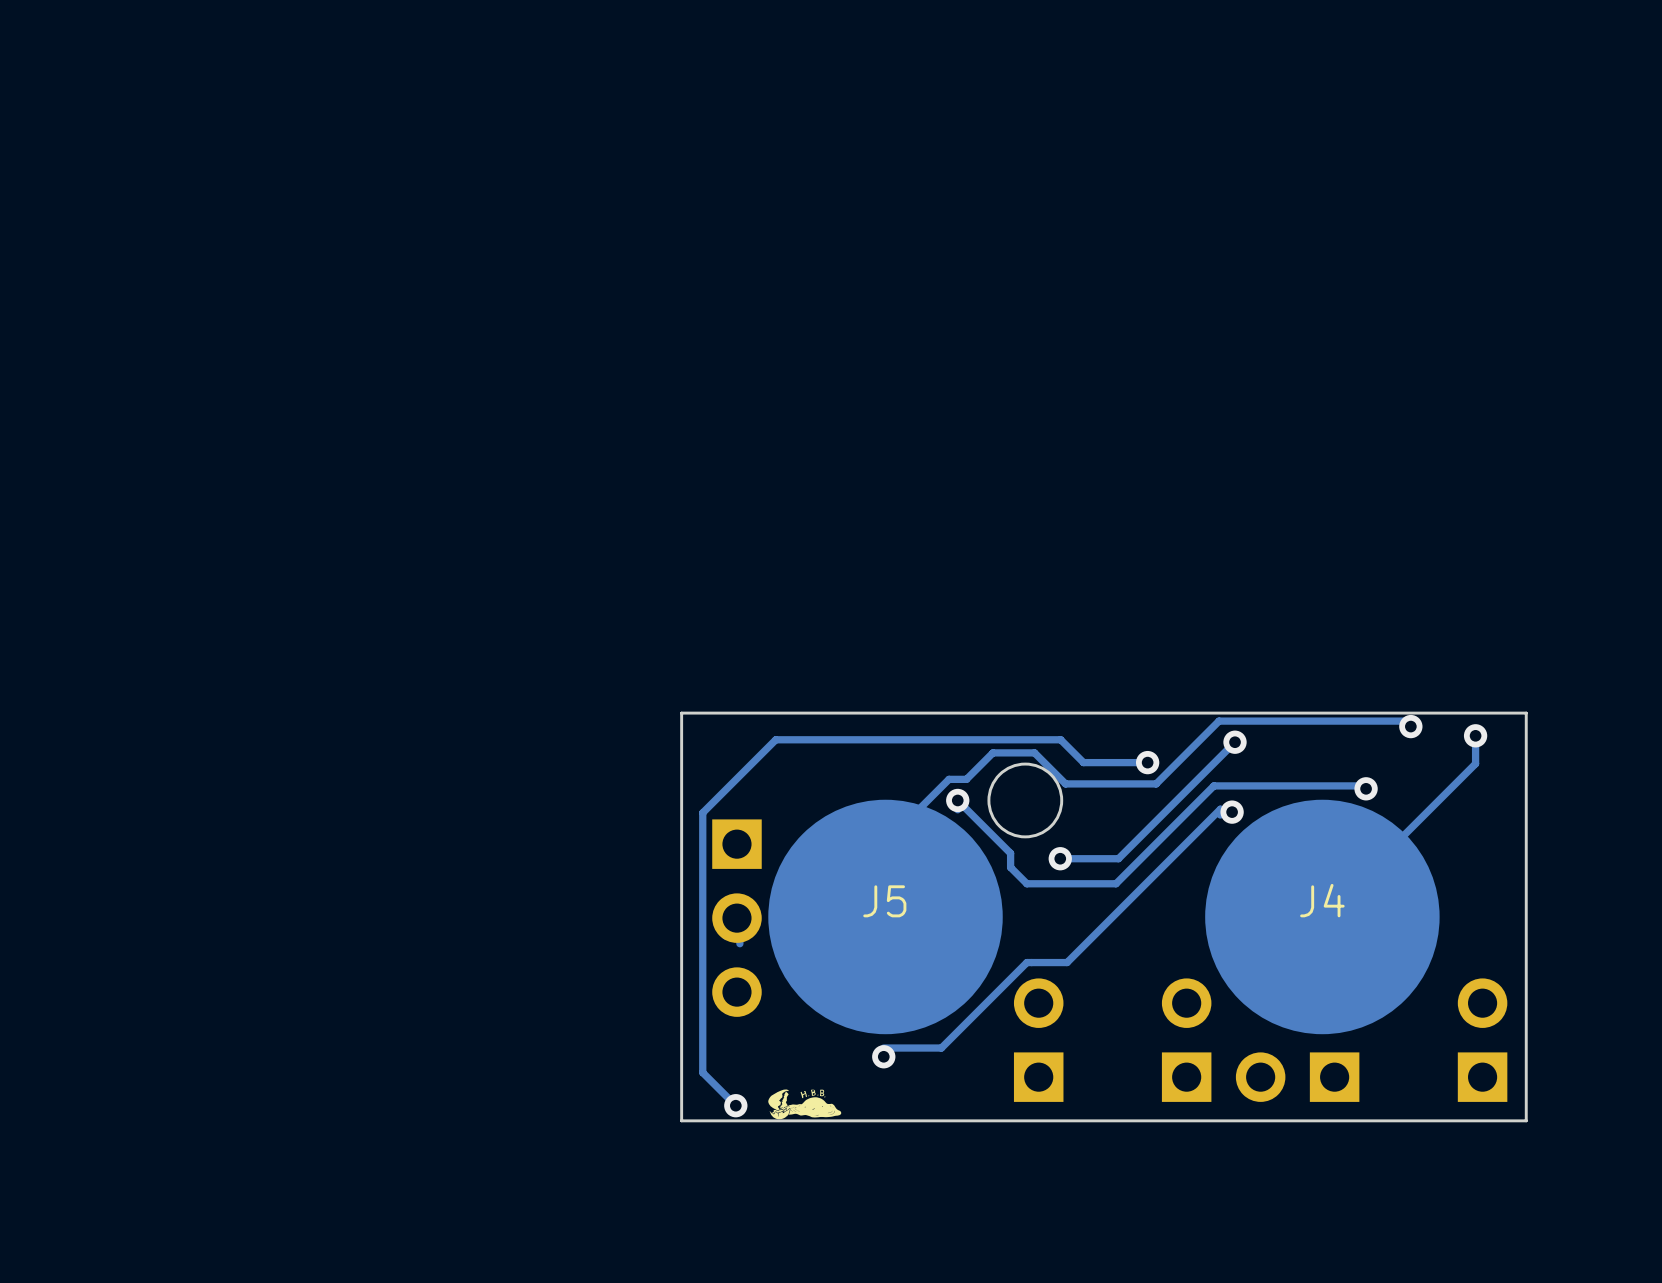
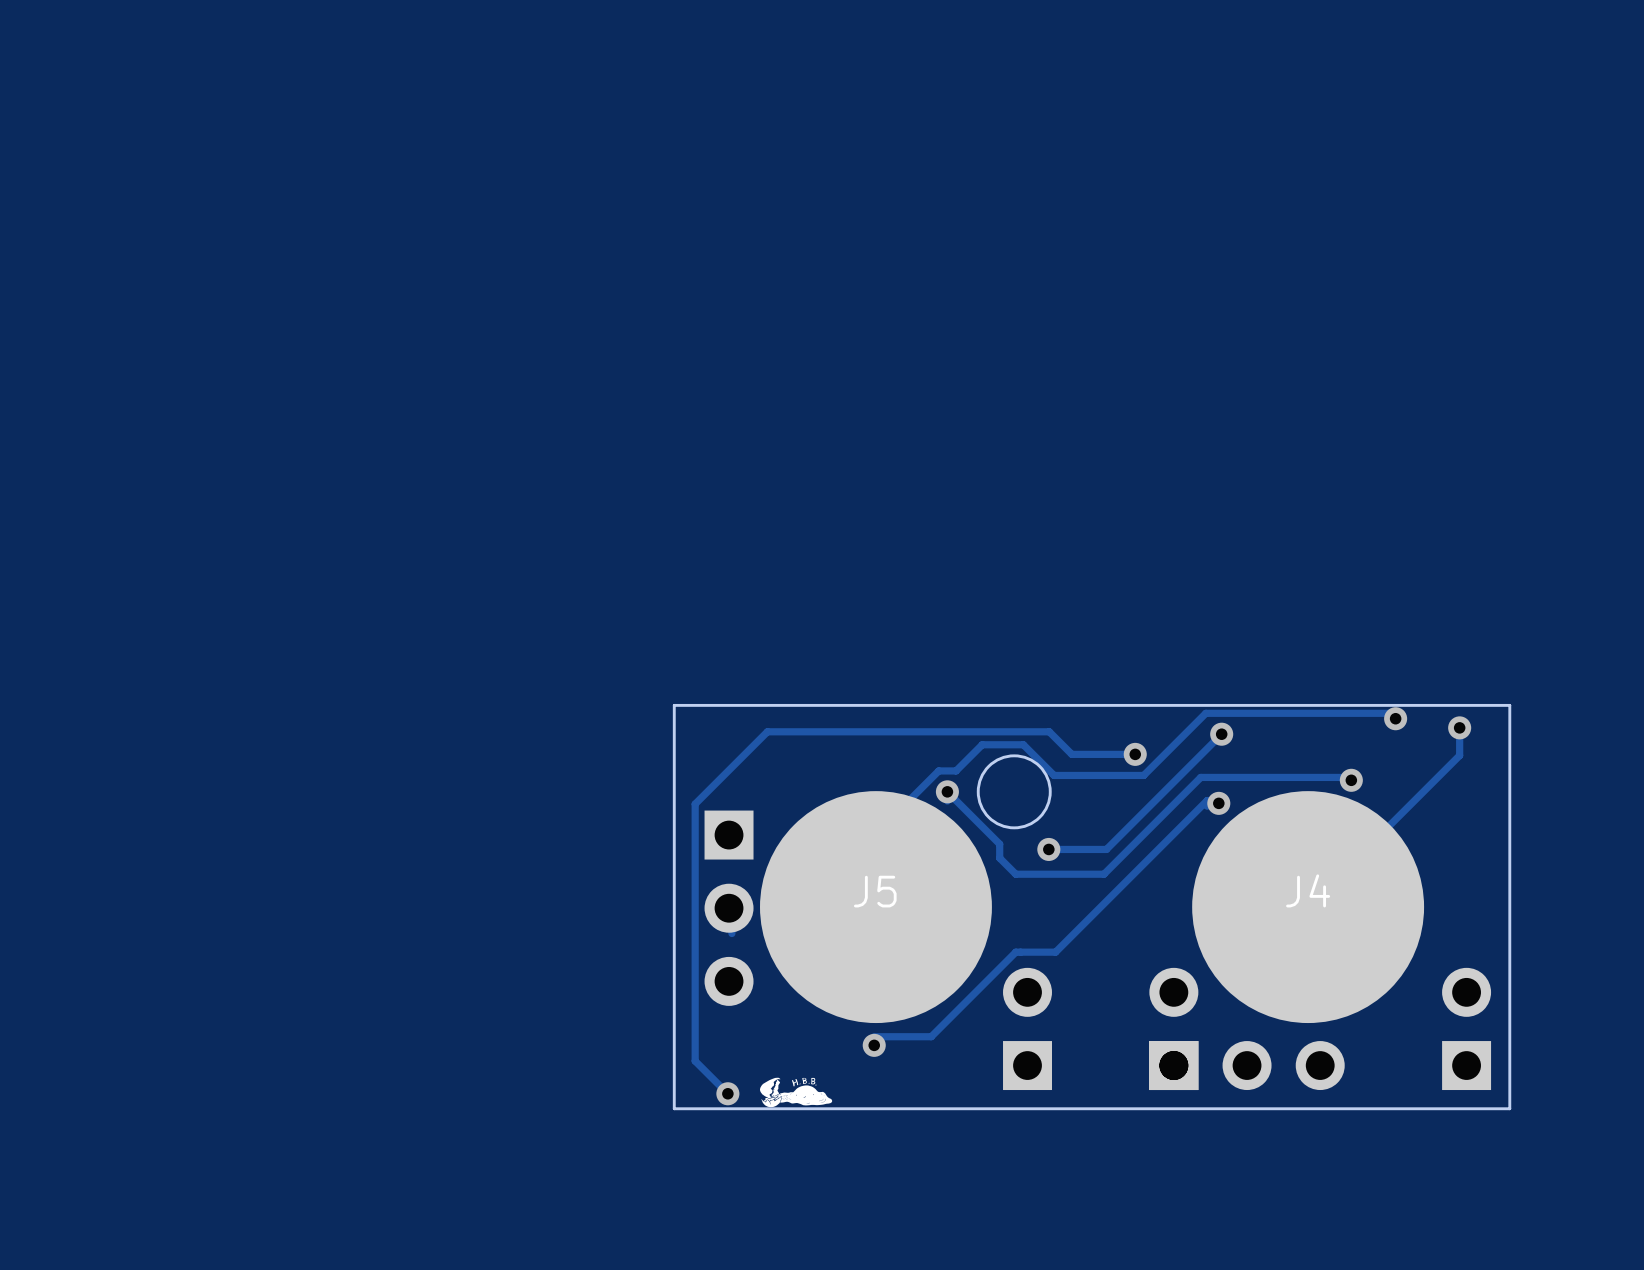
part: none -> (1247, 1065)
part: (1297, 1077) -> none

